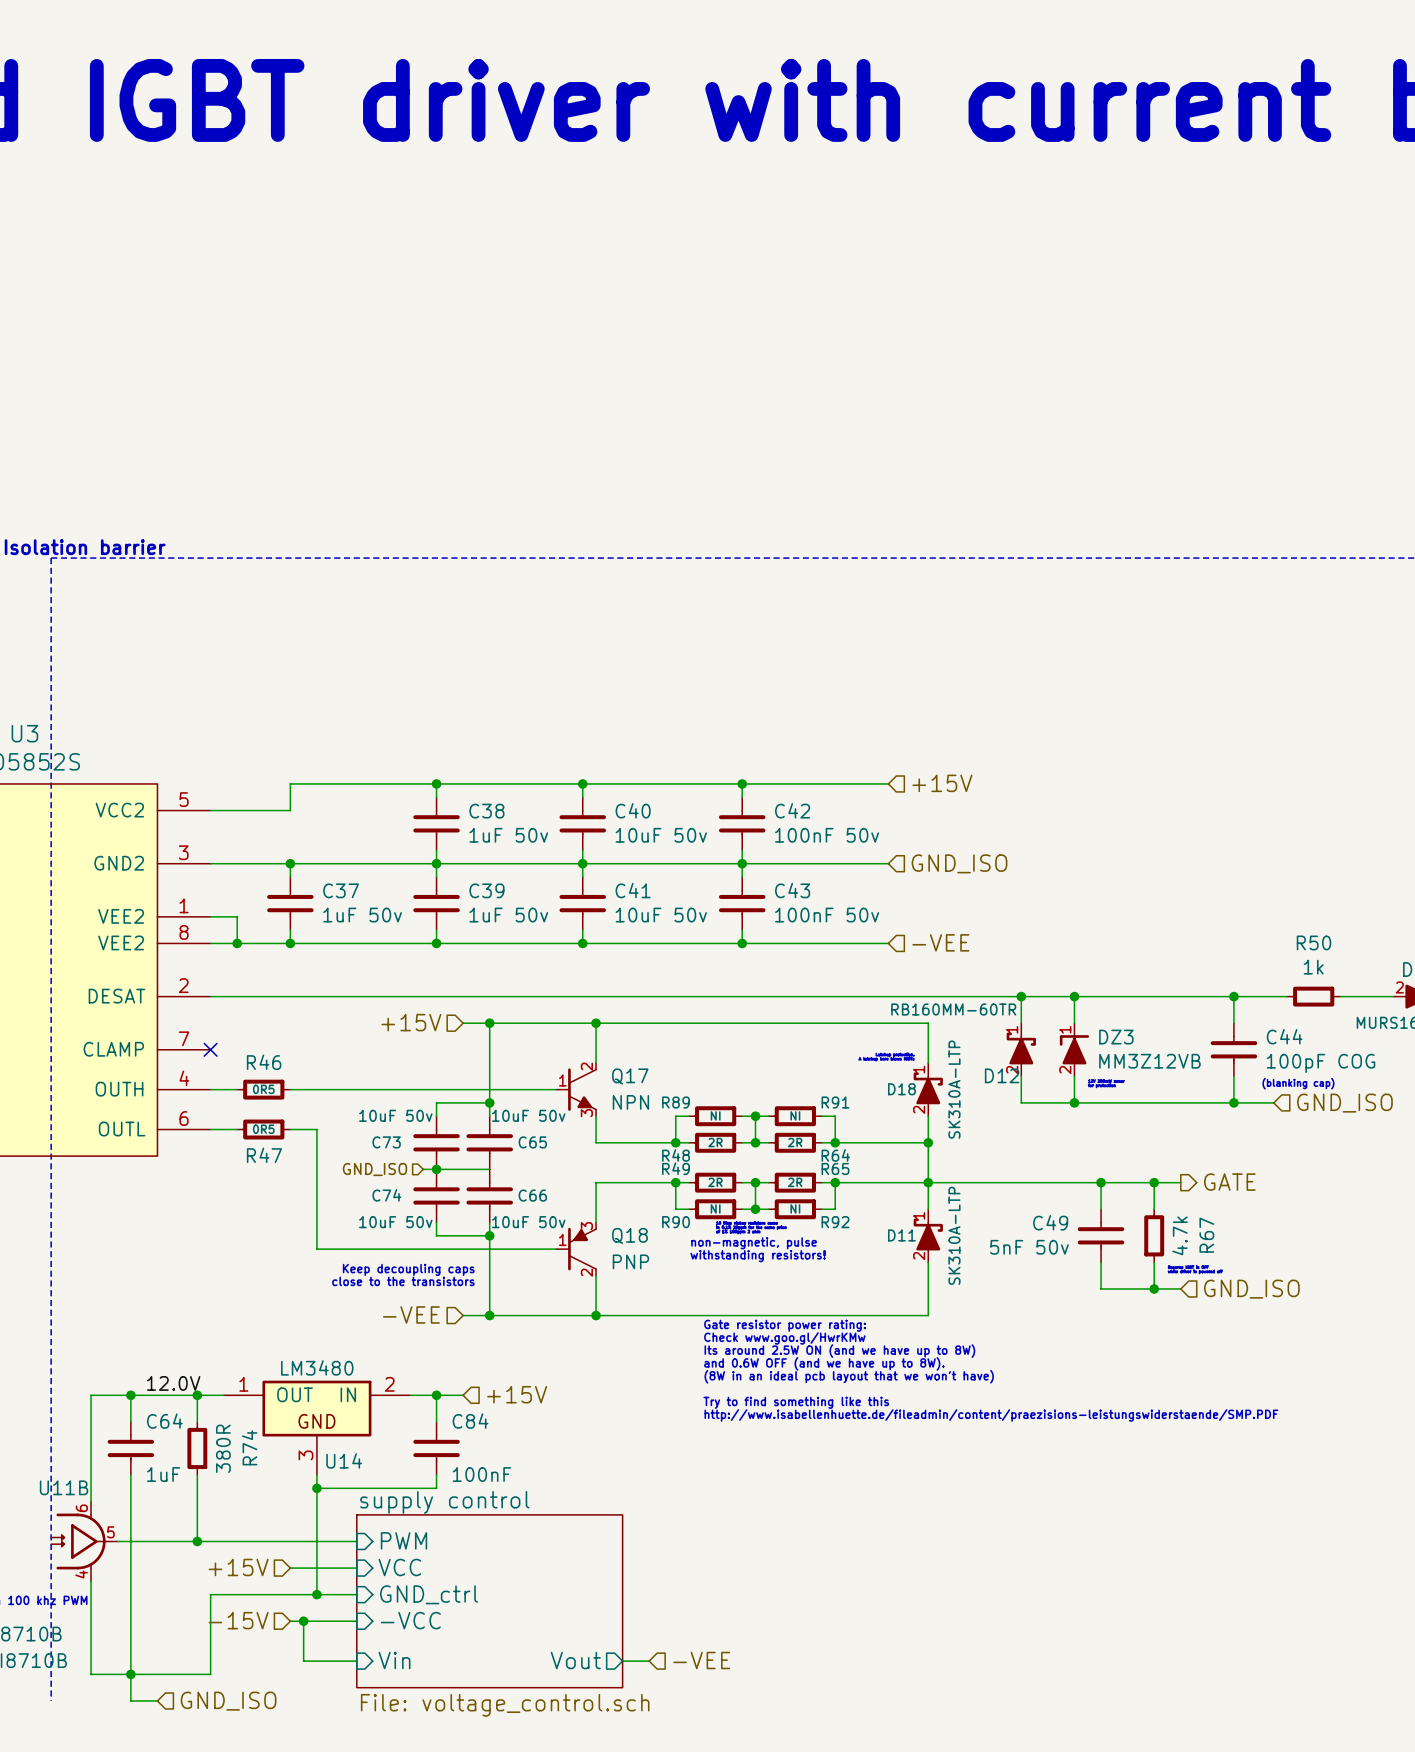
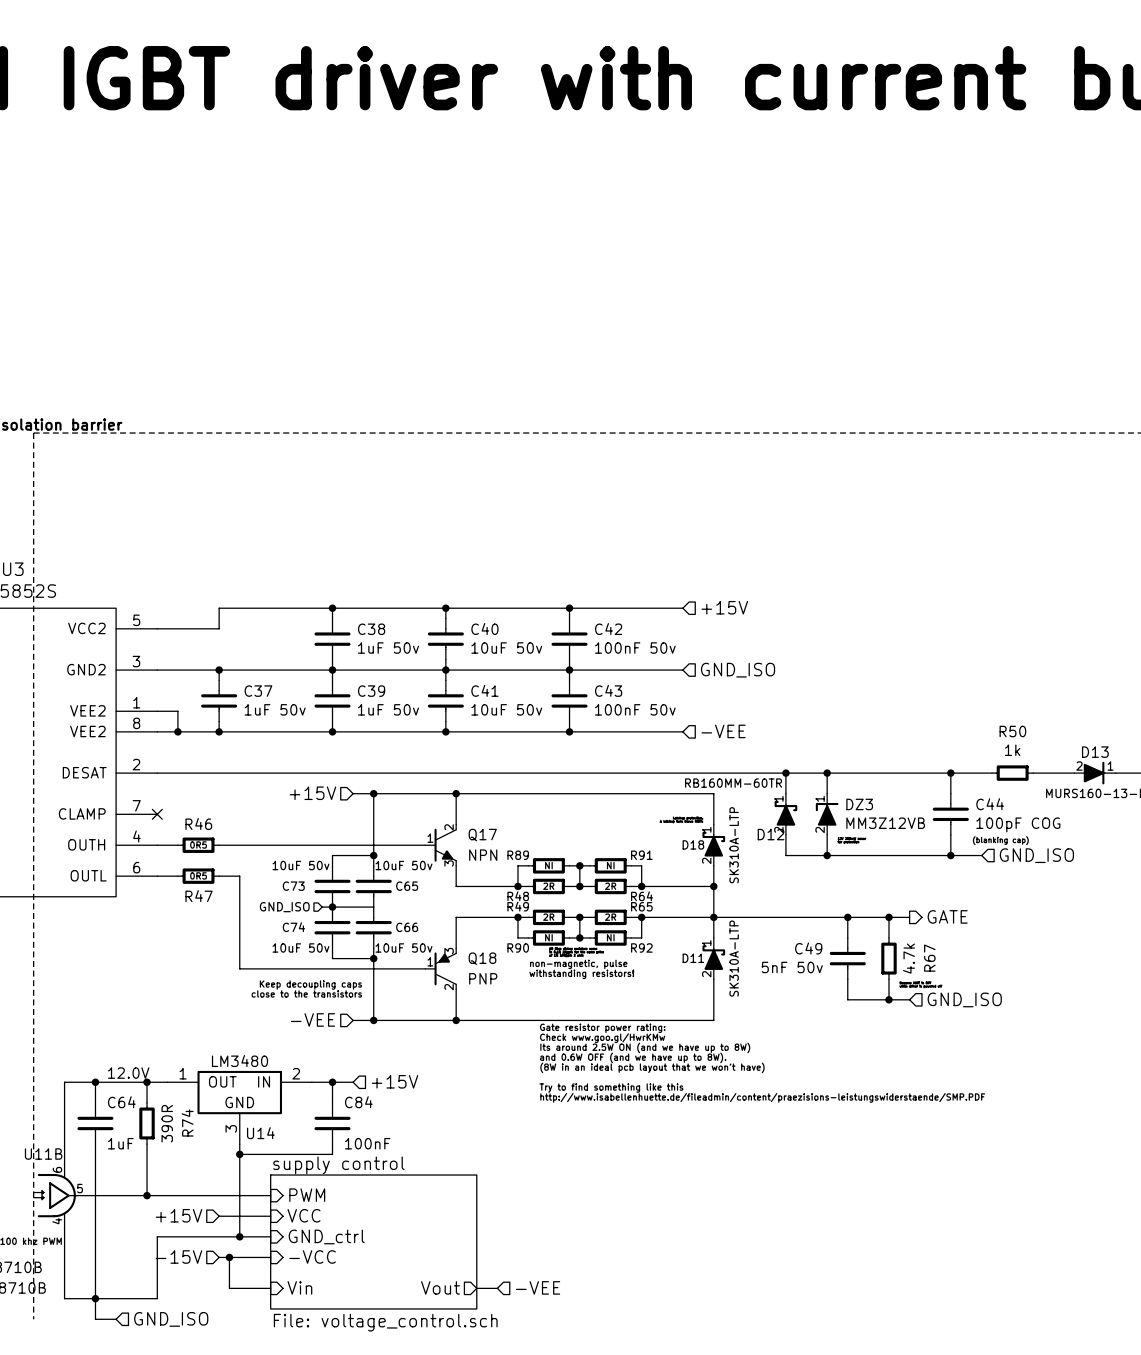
R74 value: 380R (223, 1448) -> 390R (167, 1123)

